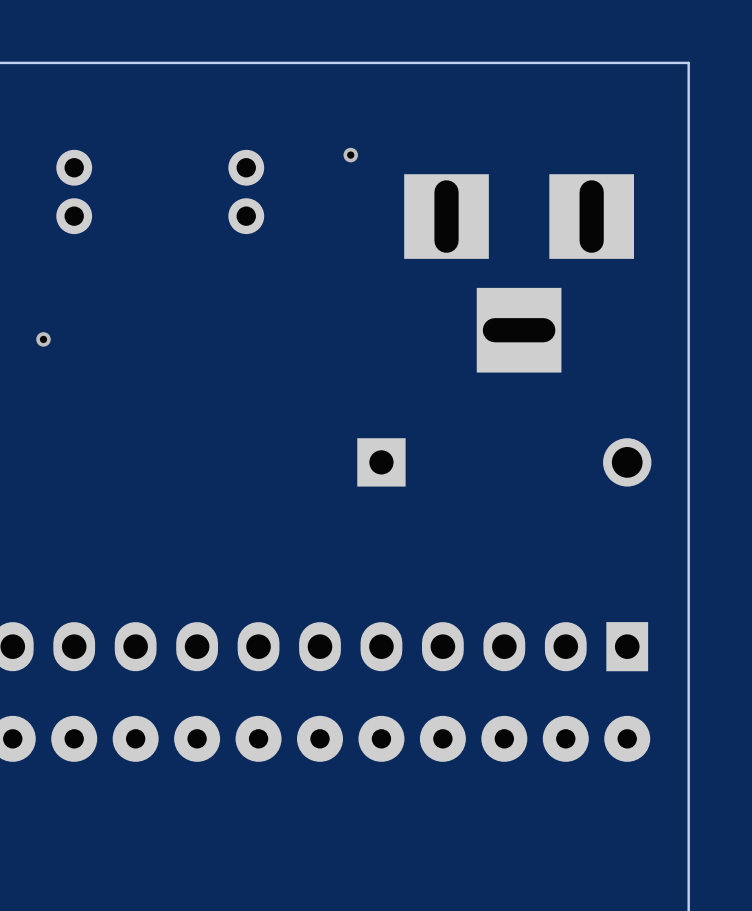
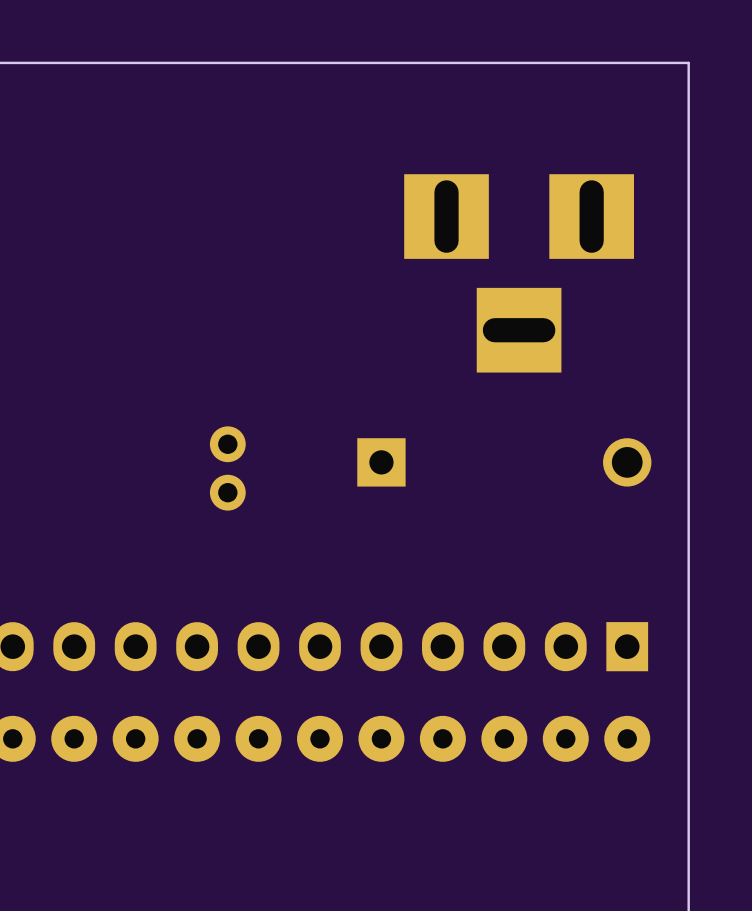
via: (350, 155) -> none
part: (74, 191) -> none
part: (246, 191) -> none
via: (43, 339) -> none
part: none -> (227, 468)

